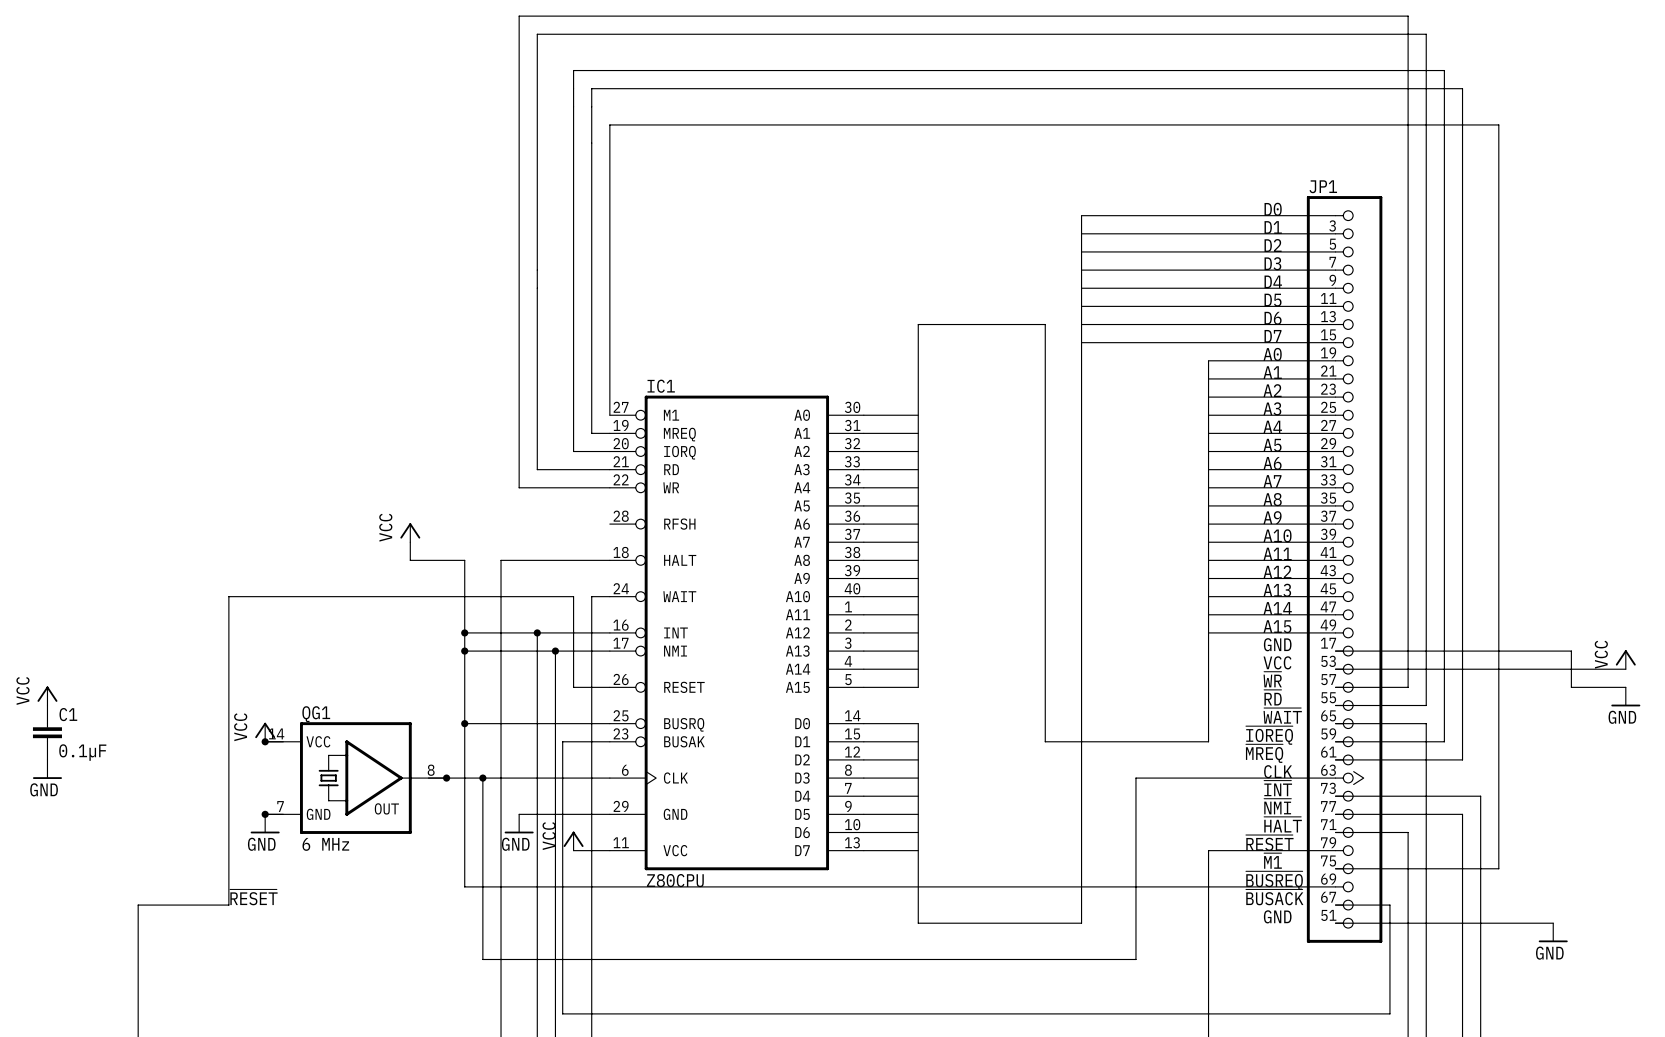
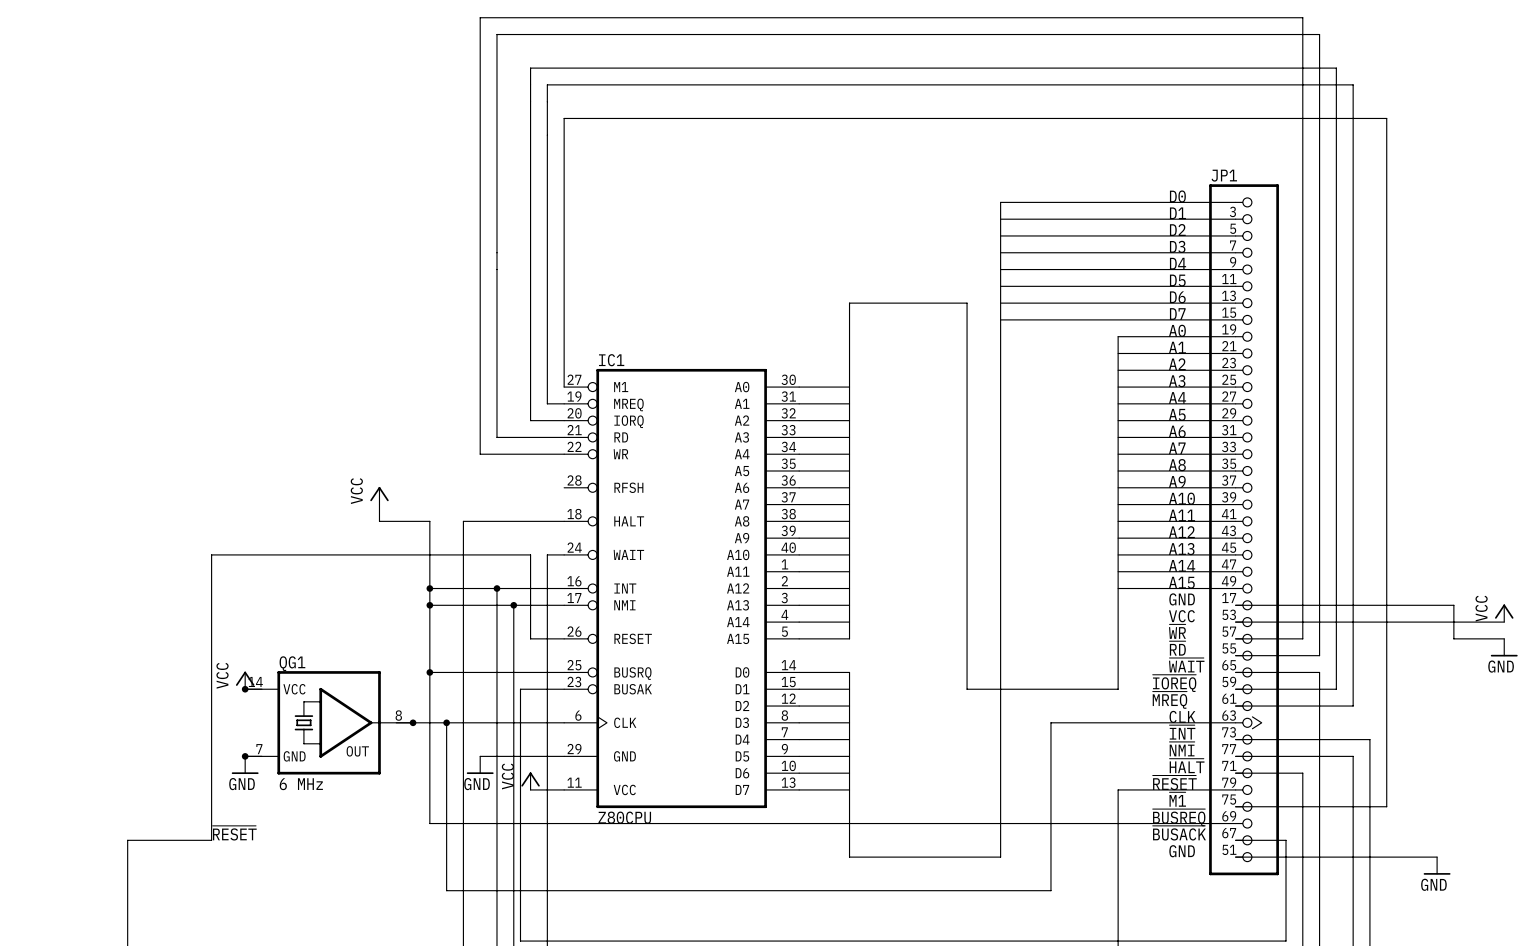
power symbol: VCC (47, 695) -> none
C1: 0.1µF (47, 732) -> none
power symbol: GND (47, 769) -> none

